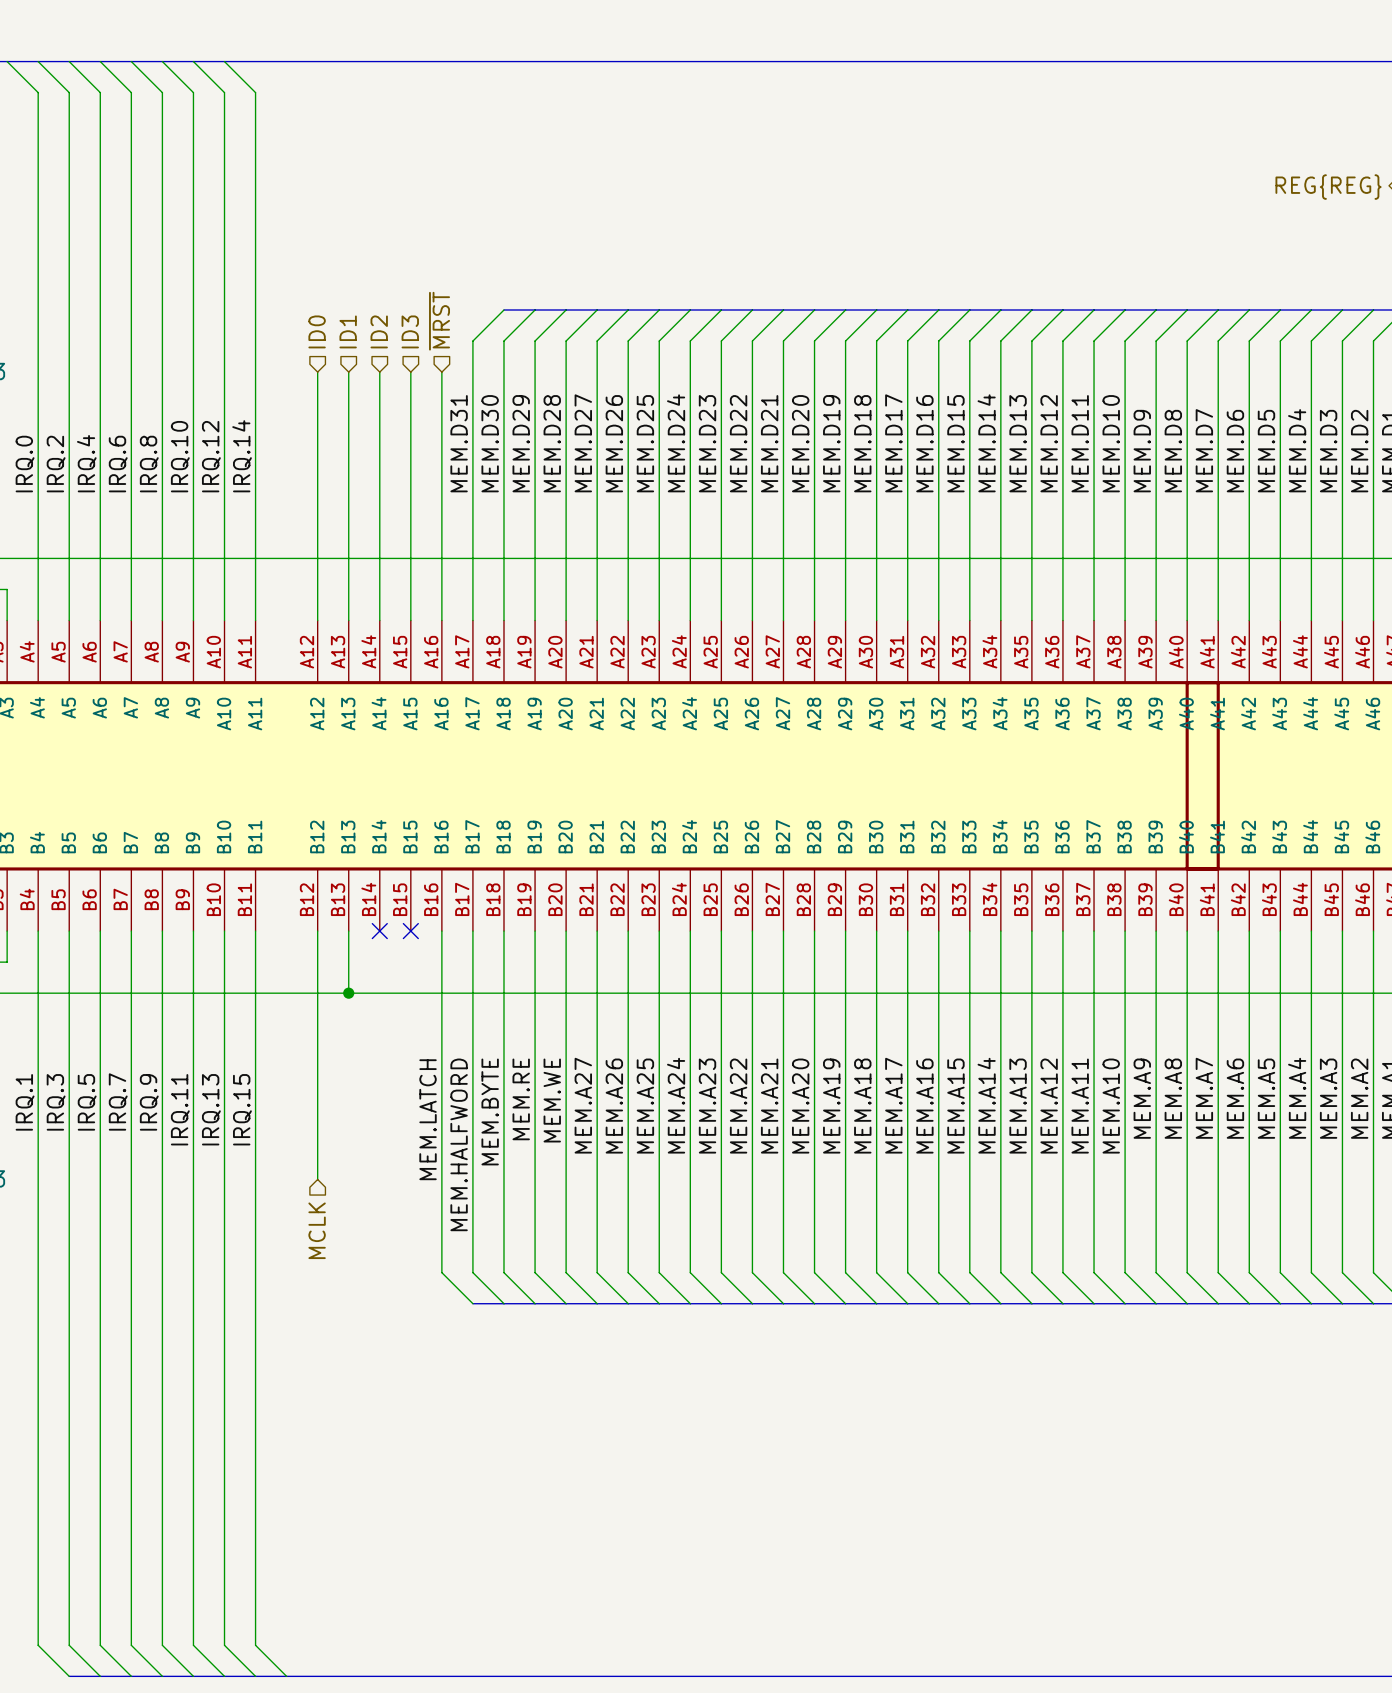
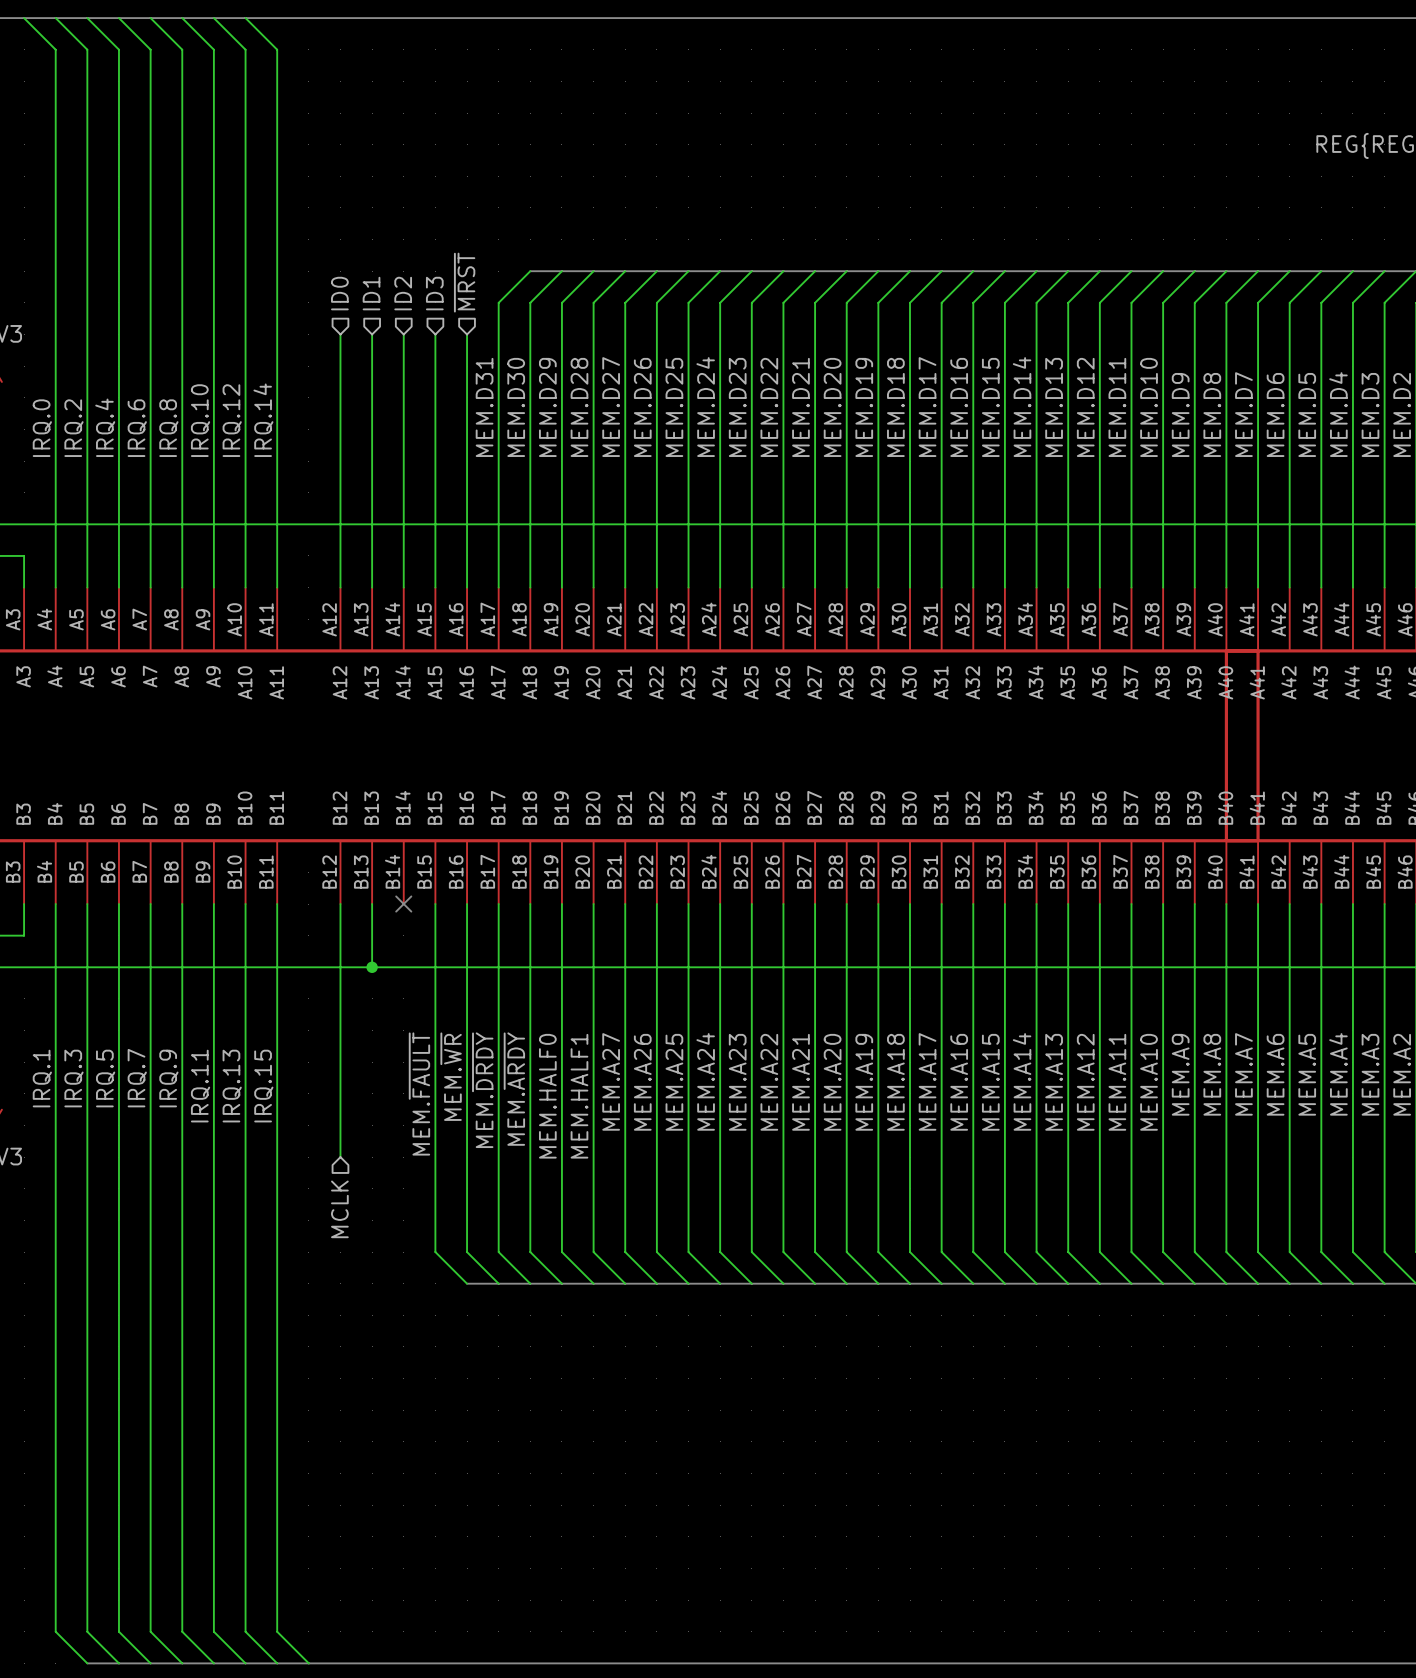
wire: none -> (435, 904) (435, 1252) (467, 1283)
no-connect mark: (410, 931) -> none
label: MEM.RE (521, 1099) -> MEM.HALF0 (547, 1096)
label: MEM.WE (552, 1100) -> MEM.HALF1 (579, 1096)
label: MEM.BYTE (490, 1111) -> MEM.~{ARDY} (514, 1089)
label: none -> MEM.~{FAULT} (419, 1093)
label: MEM.LATCH (428, 1119) -> MEM.~{WR} (451, 1076)
label: MEM.HALFWORD (459, 1144) -> MEM.~{DRDY} (482, 1090)
bus: none -> (467, 1283) (498, 1283)

